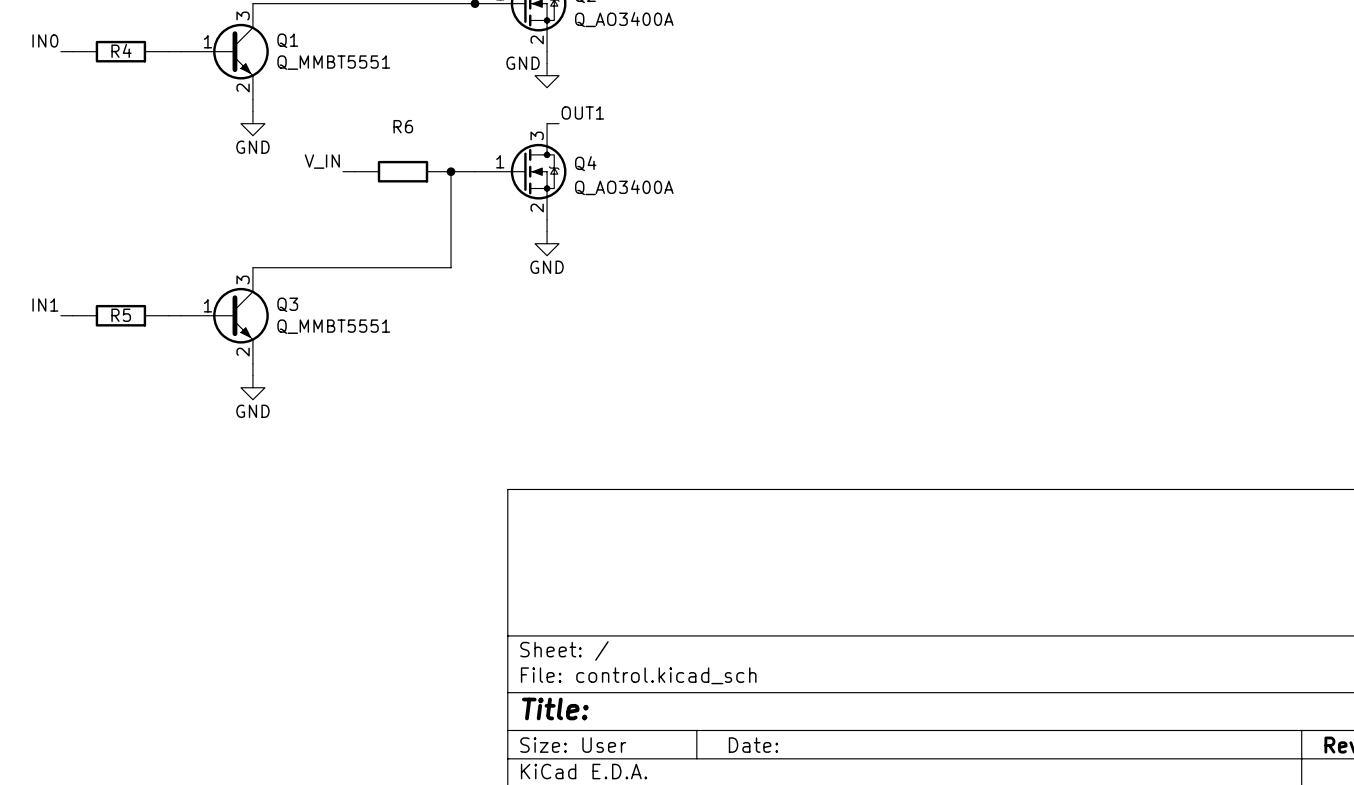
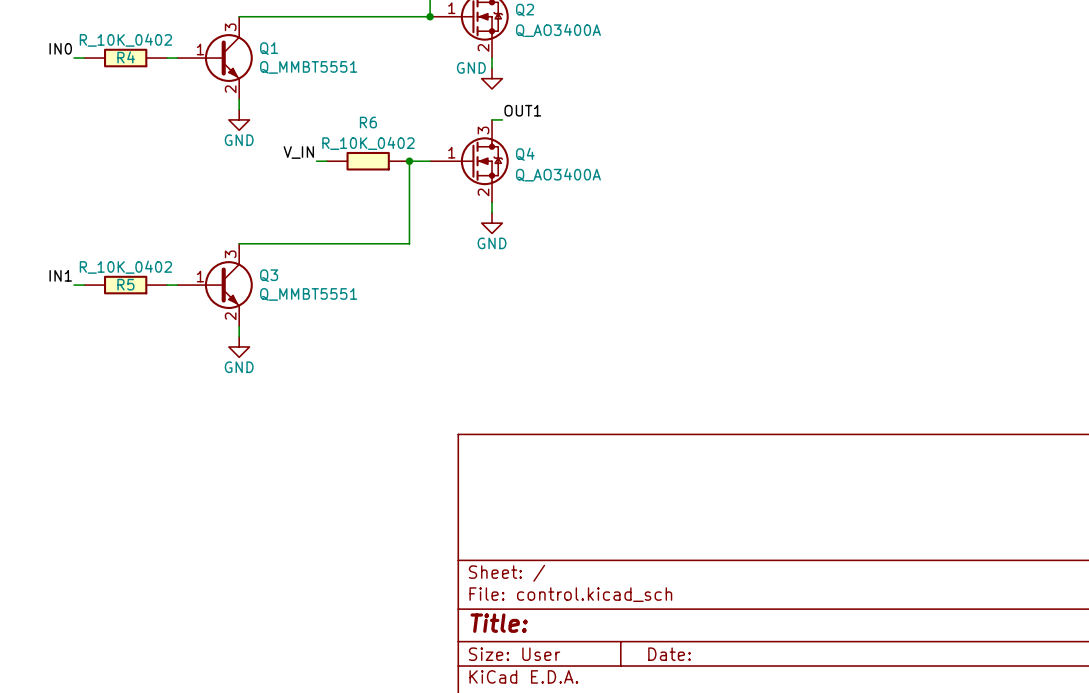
R4 value: none -> R_10K_0402 (125, 40)
R6 value: none -> R_10K_0402 (368, 143)
R5 value: none -> R_10K_0402 (125, 267)

